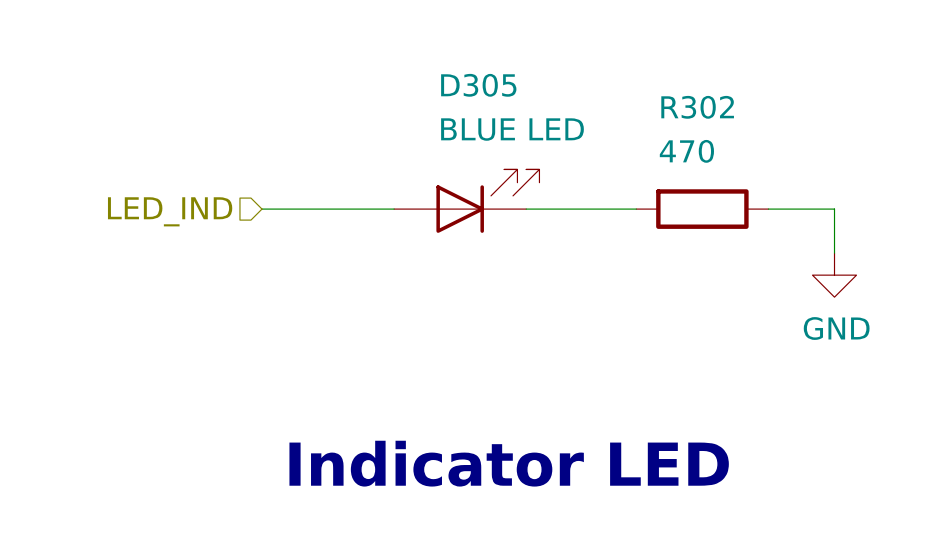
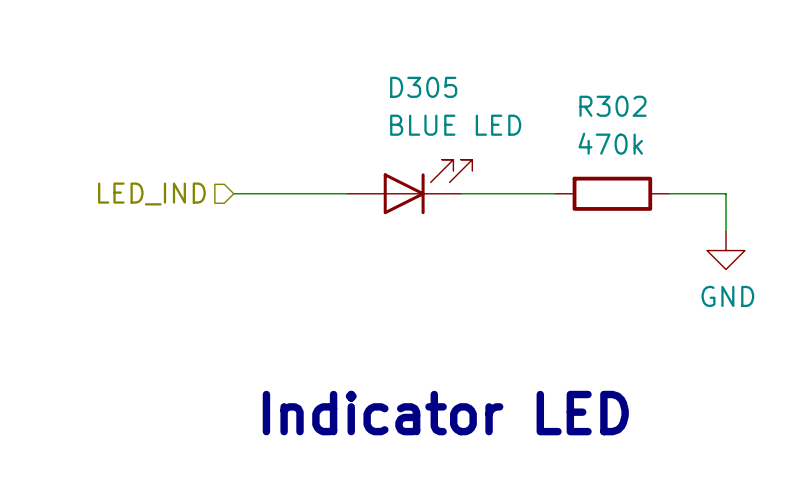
R302 value: 470 (686, 151) -> 470k (610, 143)

